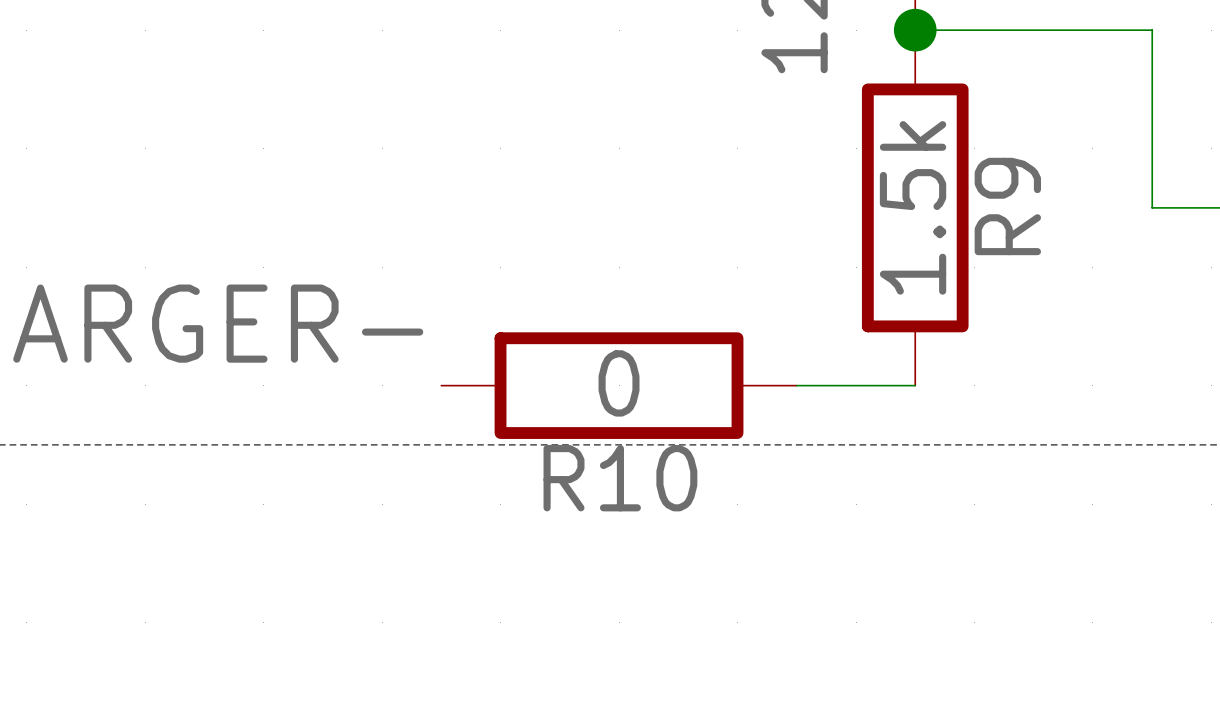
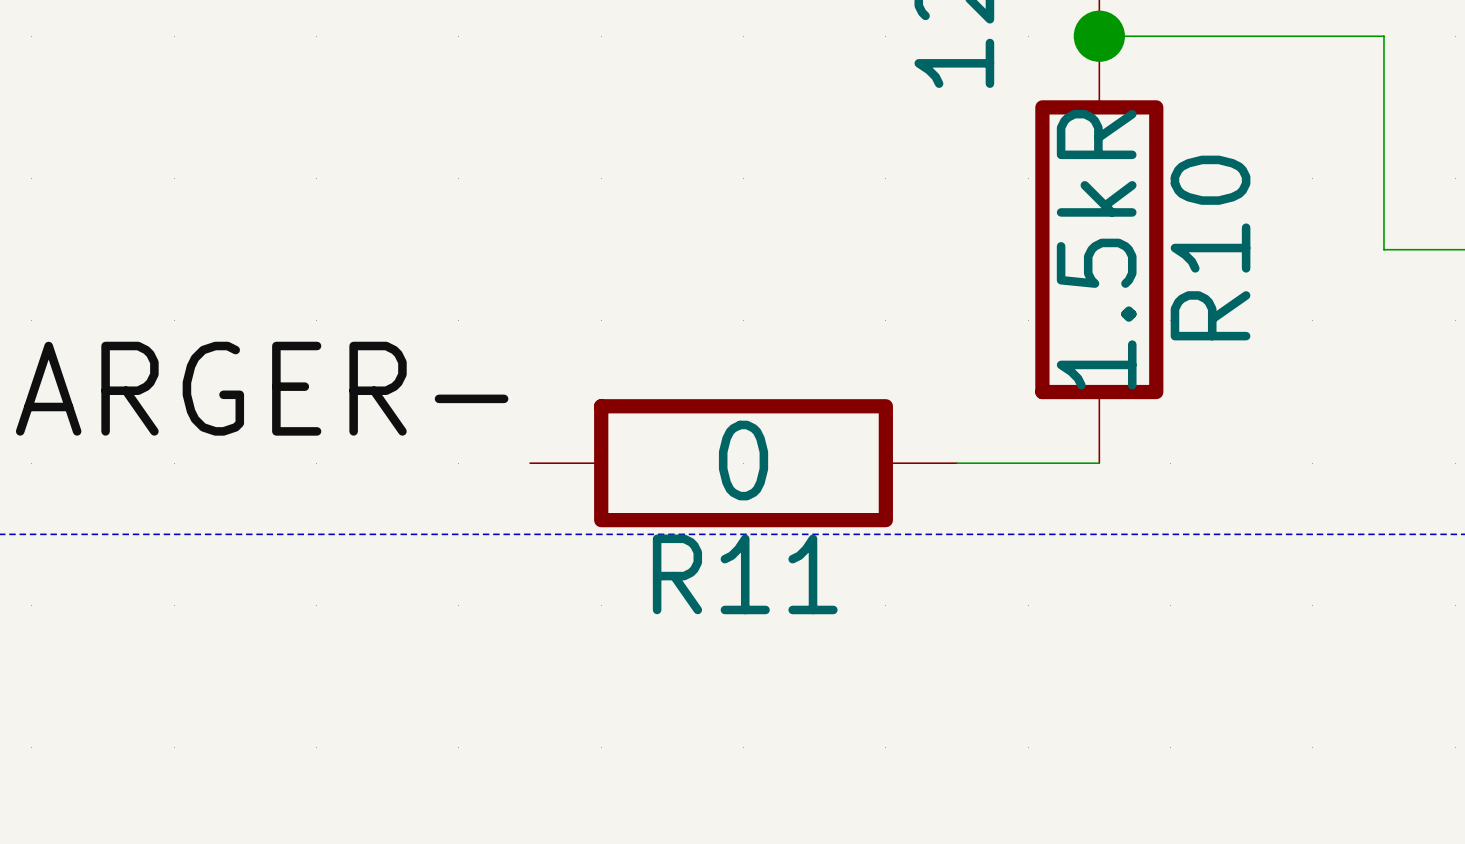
R9 name: R9 (1007, 206) -> R10 (1210, 248)
R9 value: 1.5k (913, 207) -> 1.5kR (1096, 249)
R10 name: R10 (620, 478) -> R11 (745, 574)

